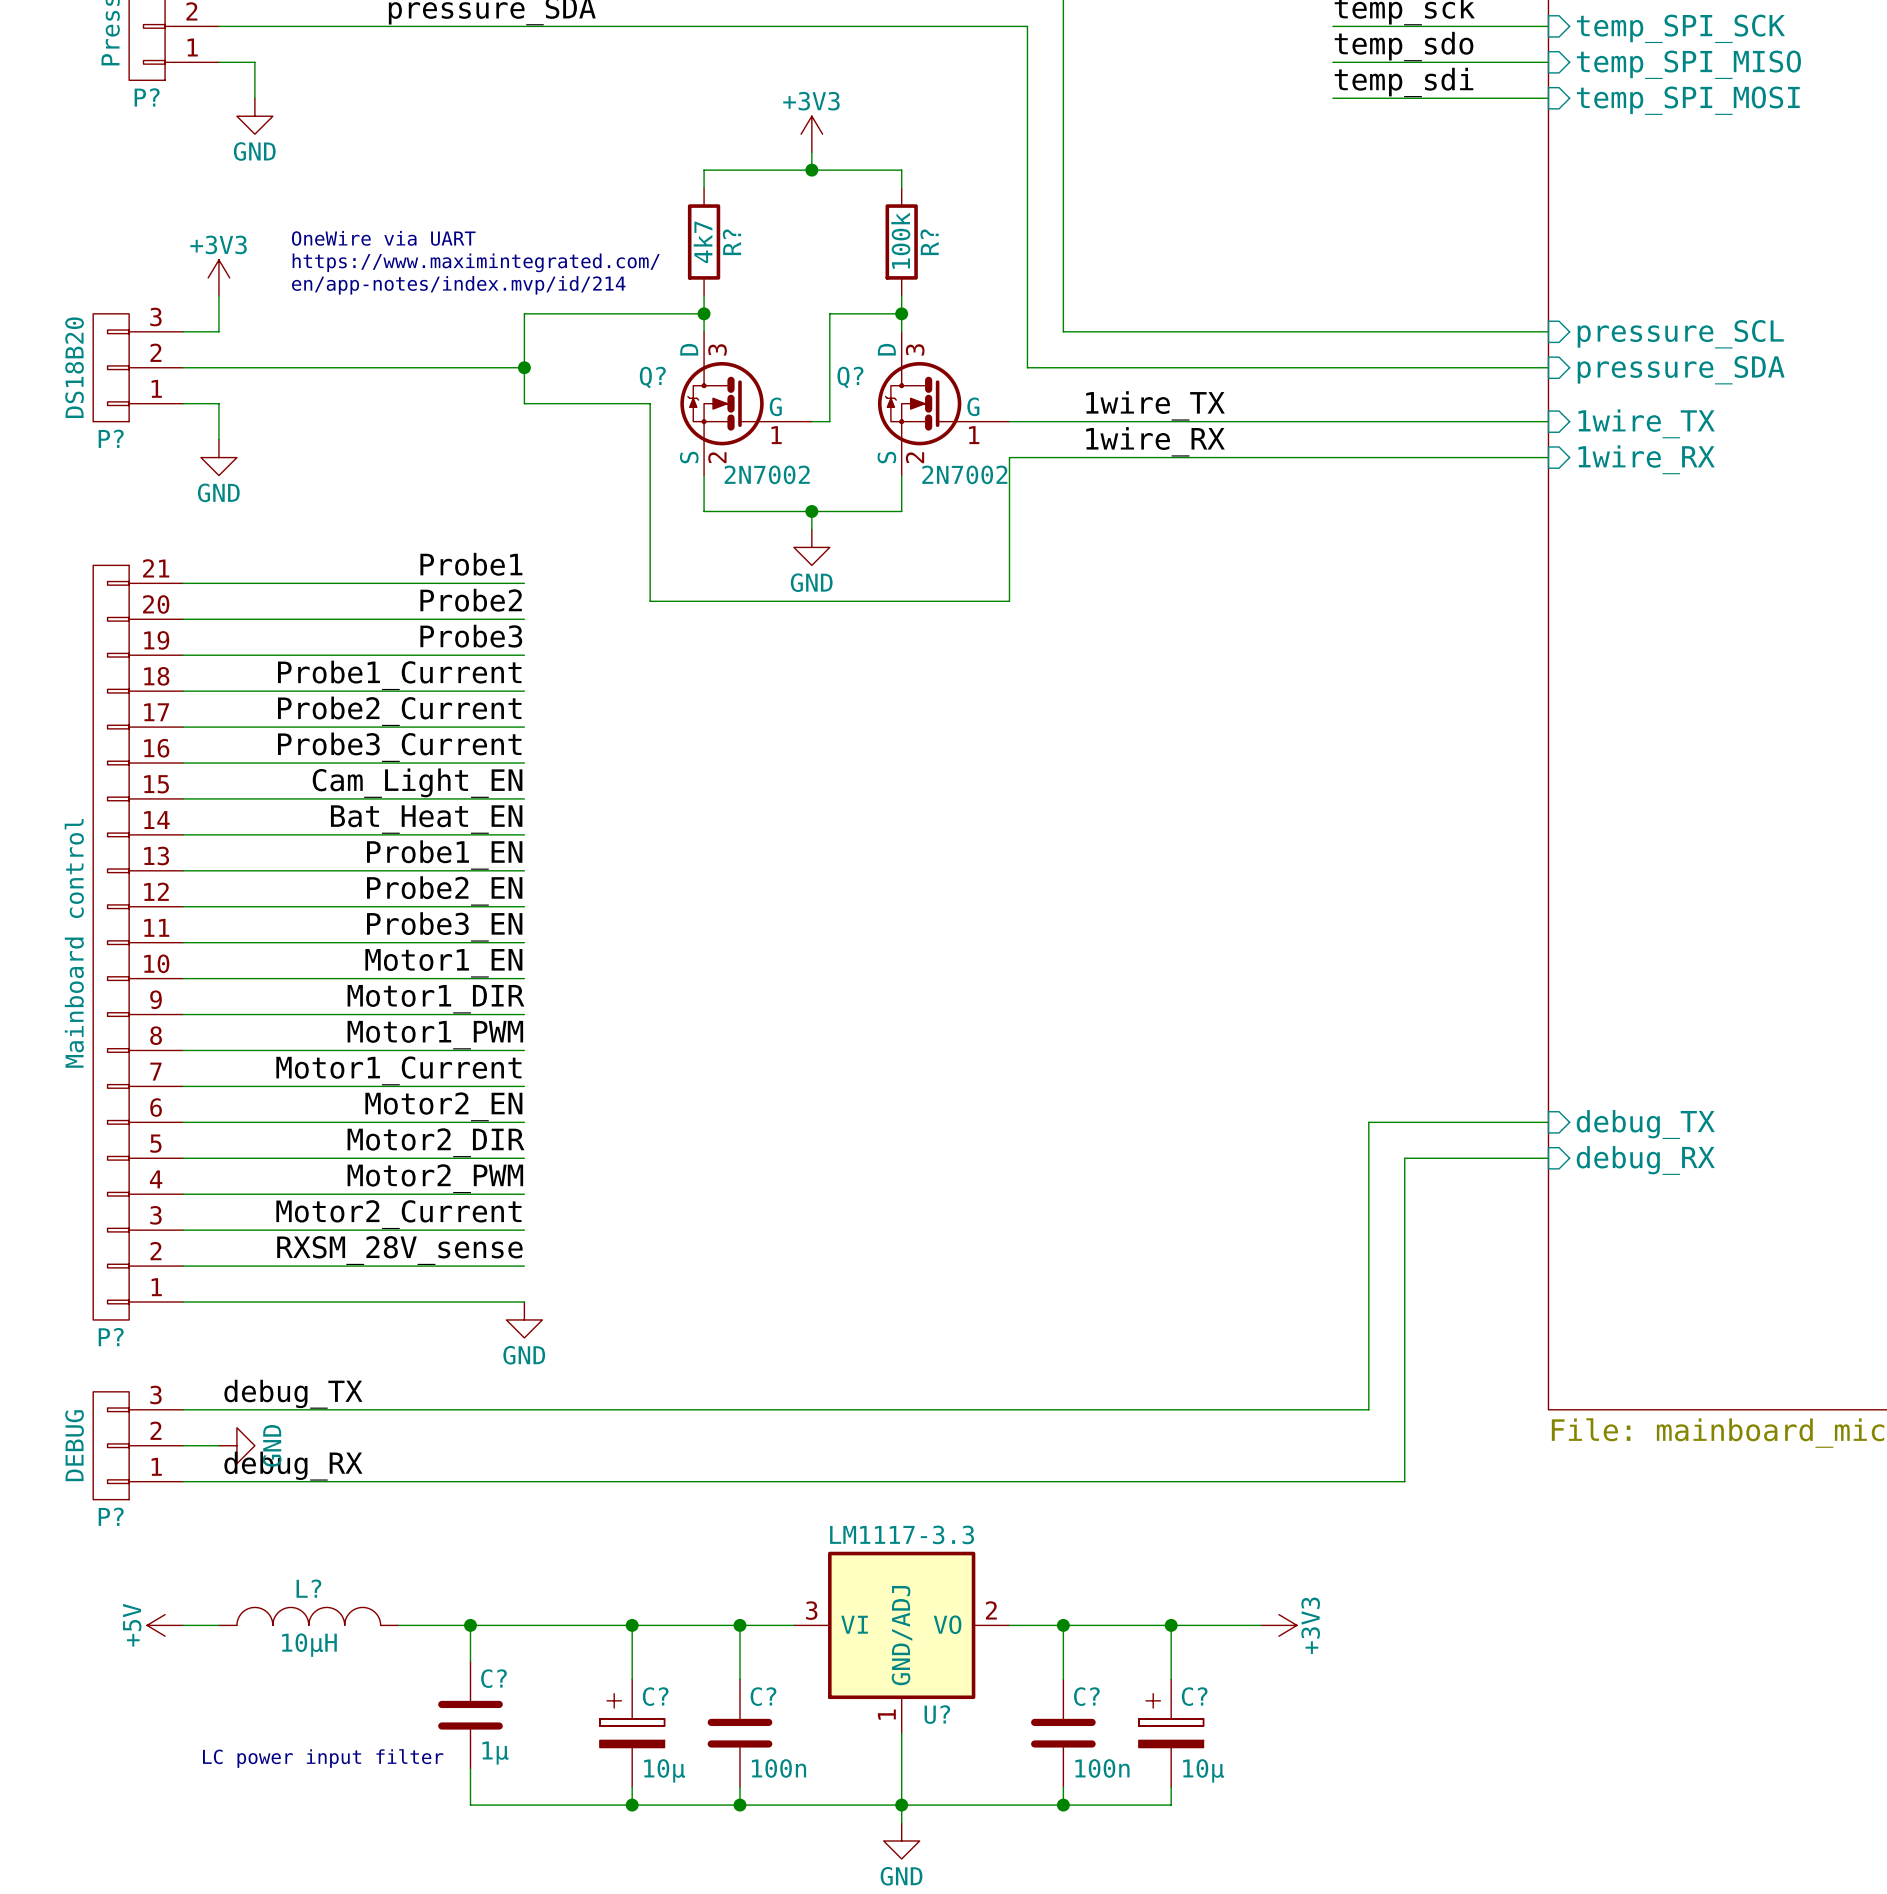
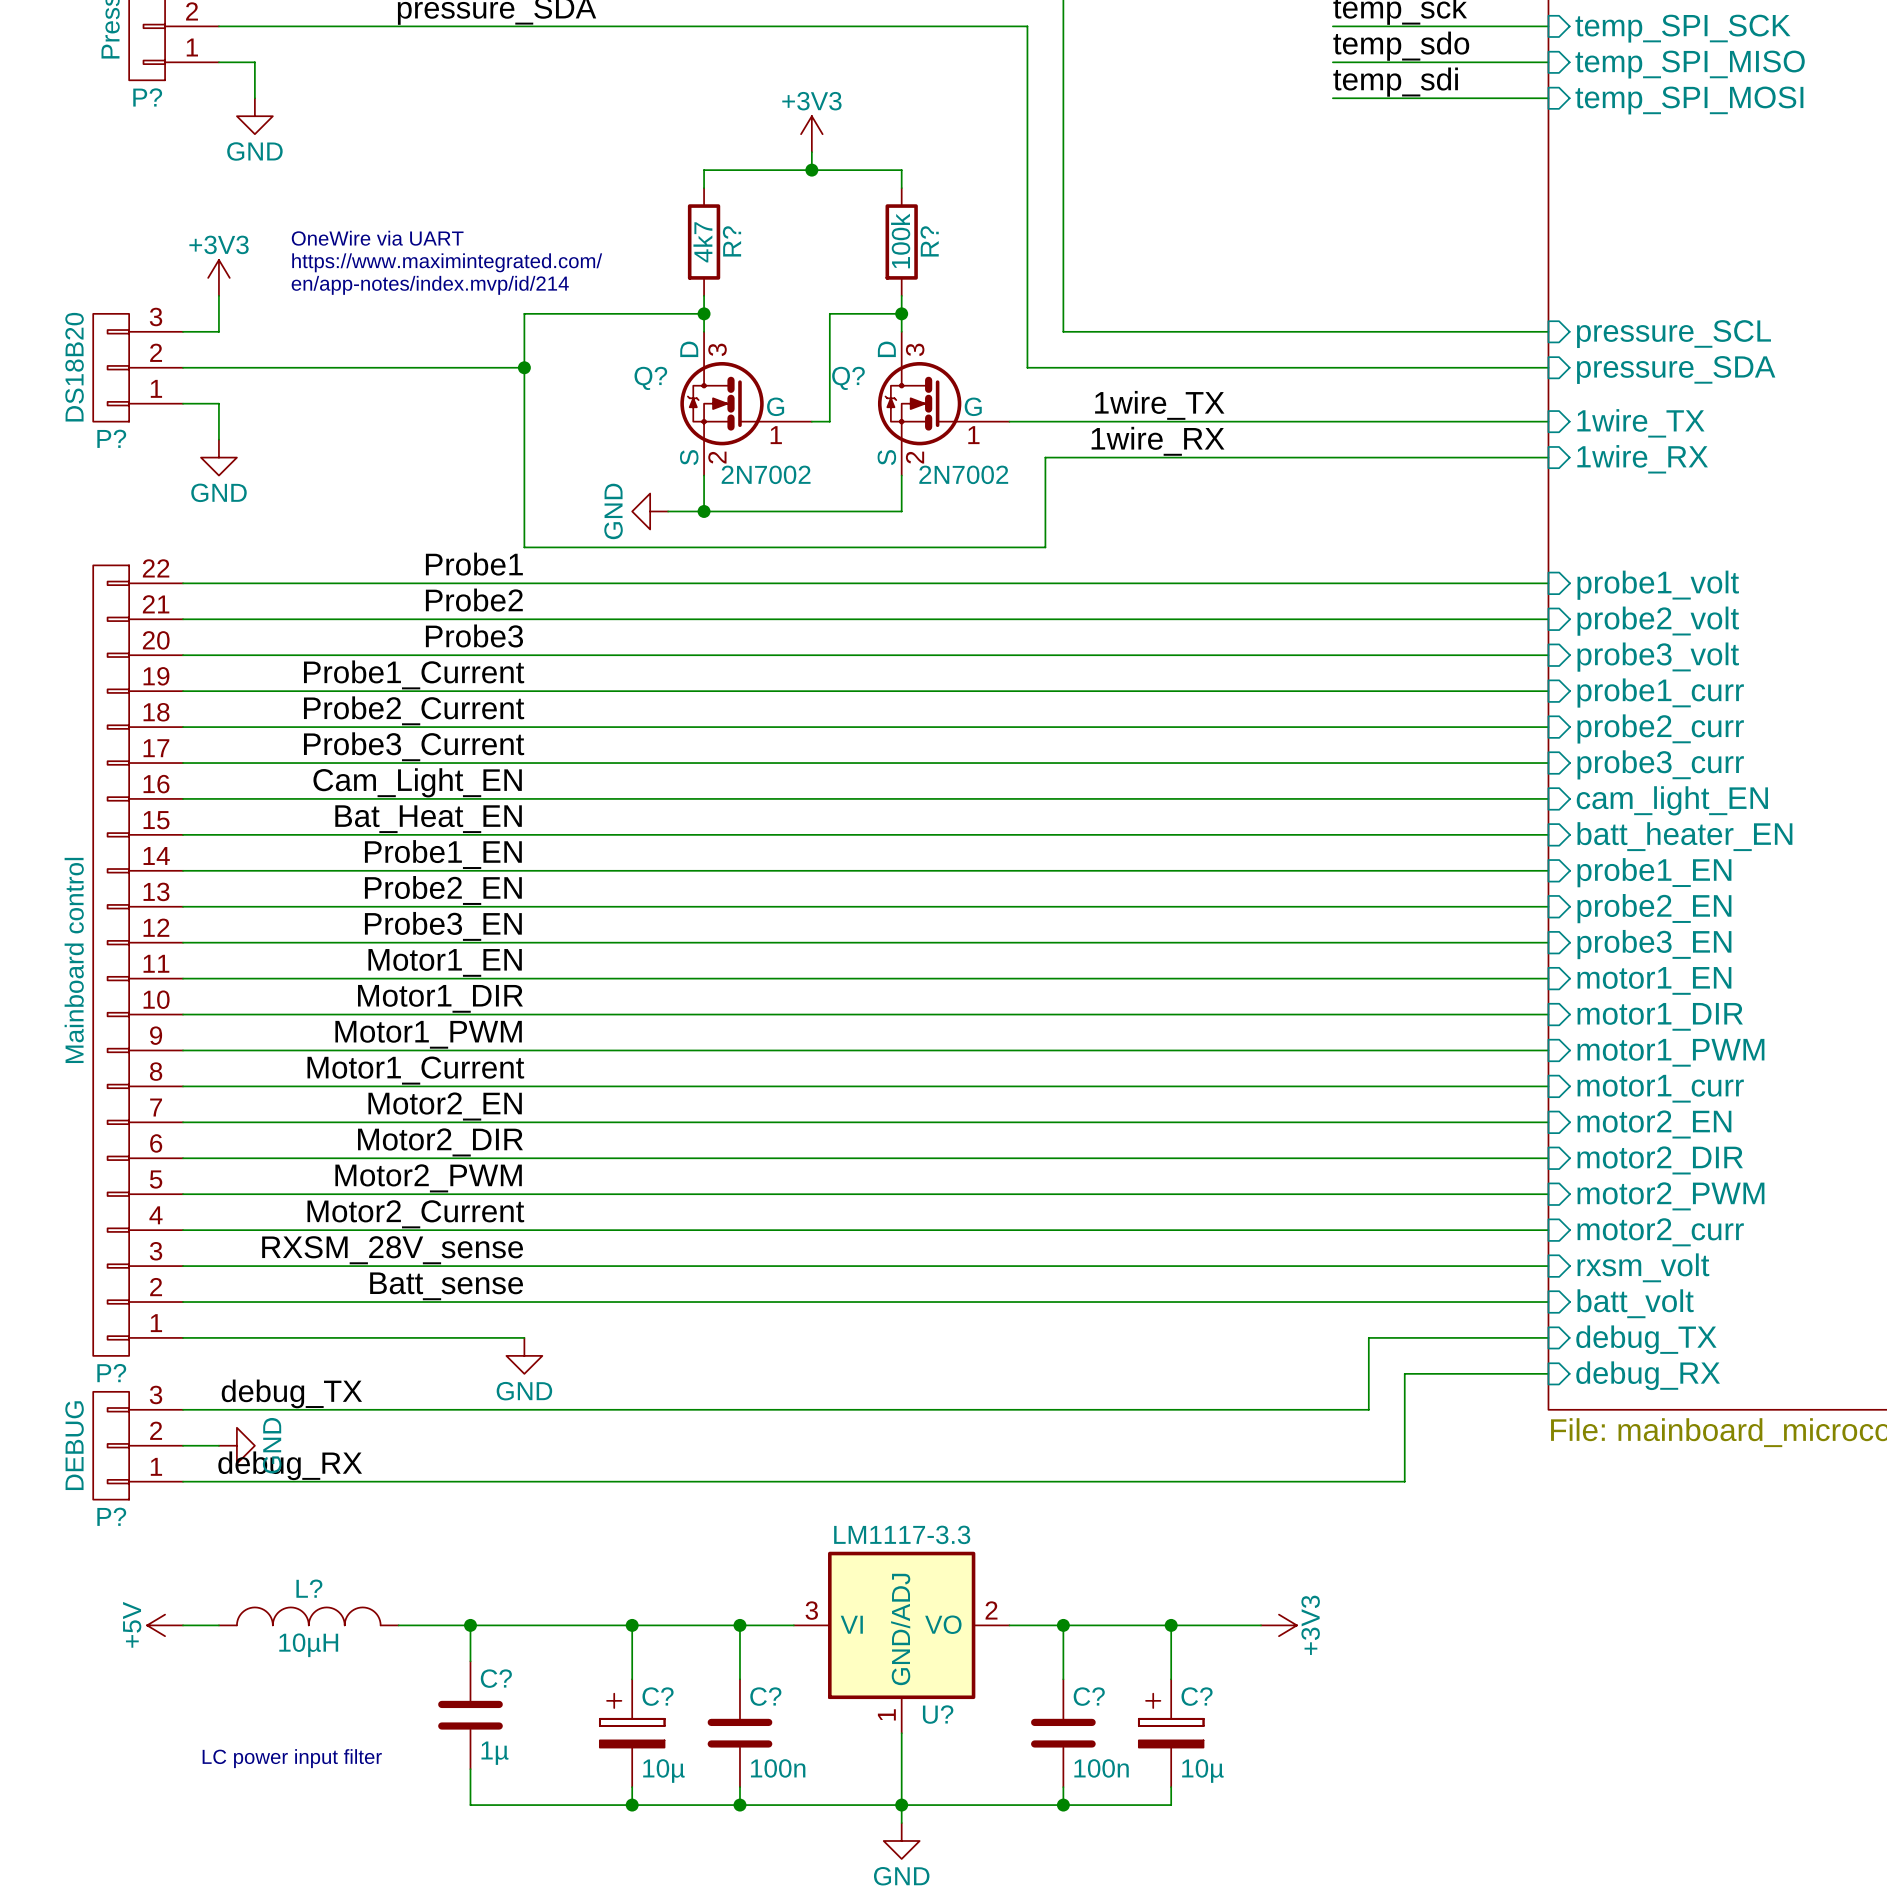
wire: (524, 403) (650, 403) (650, 601) (1009, 601) (1009, 457) (1045, 457) -> (524, 403) (524, 547) (1045, 547) (1045, 457)
wire: none -> (668, 511) (704, 511)
junction: none -> (704, 511)
wire: (811, 511) (811, 529) -> none
junction: (811, 511) -> none
power symbol rotation: 0° (811, 547) -> 90° clockwise (650, 511)
power symbol position: GND (811, 547) -> GND (650, 511)
wire: none -> (524, 583) (1548, 583)
sheet pin: none -> probe1_volt (1658, 585)
wire: none -> (524, 619) (1548, 619)
sheet pin: none -> probe2_volt (1658, 621)
wire: none -> (524, 655) (1548, 655)
sheet pin: none -> probe3_volt (1658, 657)
wire: none -> (524, 691) (1548, 691)
sheet pin: none -> probe1_curr (1660, 693)
wire: none -> (524, 727) (1548, 727)
sheet pin: none -> probe2_curr (1660, 728)
wire: none -> (524, 763) (1548, 763)
sheet pin: none -> probe3_curr (1660, 764)
wire: none -> (524, 798) (1548, 798)
sheet pin: none -> cam_light_EN (1672, 800)
wire: none -> (524, 834) (1548, 834)
sheet pin: none -> batt_heater_EN (1684, 836)
wire: none -> (524, 870) (1548, 870)
sheet pin: none -> probe1_EN (1654, 872)
wire: none -> (524, 906) (1548, 906)
sheet pin: none -> probe2_EN (1654, 908)
P?: Mainboard control (138, 942) -> none
wire: none -> (524, 942) (1548, 942)
sheet pin: none -> probe3_EN (1654, 944)
P?: none -> Mainboard control (138, 960)
wire: none -> (524, 978) (1548, 978)
sheet pin: none -> motor1_EN (1654, 980)
wire: none -> (524, 1014) (1548, 1014)
sheet pin: none -> motor1_DIR (1660, 1016)
wire: none -> (524, 1050) (1548, 1050)
sheet pin: none -> motor1_PWM (1670, 1052)
wire: none -> (524, 1086) (1548, 1086)
sheet pin: none -> motor1_curr (1660, 1088)
wire: none -> (524, 1122) (1368, 1122)
wire: (1368, 1122) (1368, 1337) -> (1548, 1337) (1368, 1337)
sheet pin: debug_TX (1645, 1124) -> motor2_EN (1654, 1124)
wire: none -> (524, 1158) (1404, 1158)
wire: (1404, 1158) (1404, 1373) -> (1548, 1373) (1404, 1373)
sheet pin: debug_RX (1645, 1160) -> motor2_DIR (1660, 1160)
wire: none -> (524, 1194) (1548, 1194)
sheet pin: none -> motor2_PWM (1670, 1196)
wire: none -> (524, 1230) (1548, 1230)
sheet pin: none -> motor2_curr (1660, 1232)
wire: none -> (524, 1266) (1548, 1266)
sheet pin: none -> rxsm_volt (1643, 1267)
label: none -> Batt_sense (446, 1286)
wire: none -> (524, 1302) (1548, 1302)
sheet pin: none -> batt_volt (1635, 1303)
power symbol position: GND (524, 1319) -> GND (524, 1355)
wire: none -> (183, 1337) (524, 1337)
sheet pin: none -> debug_TX (1646, 1339)
sheet pin: none -> debug_RX (1648, 1375)

